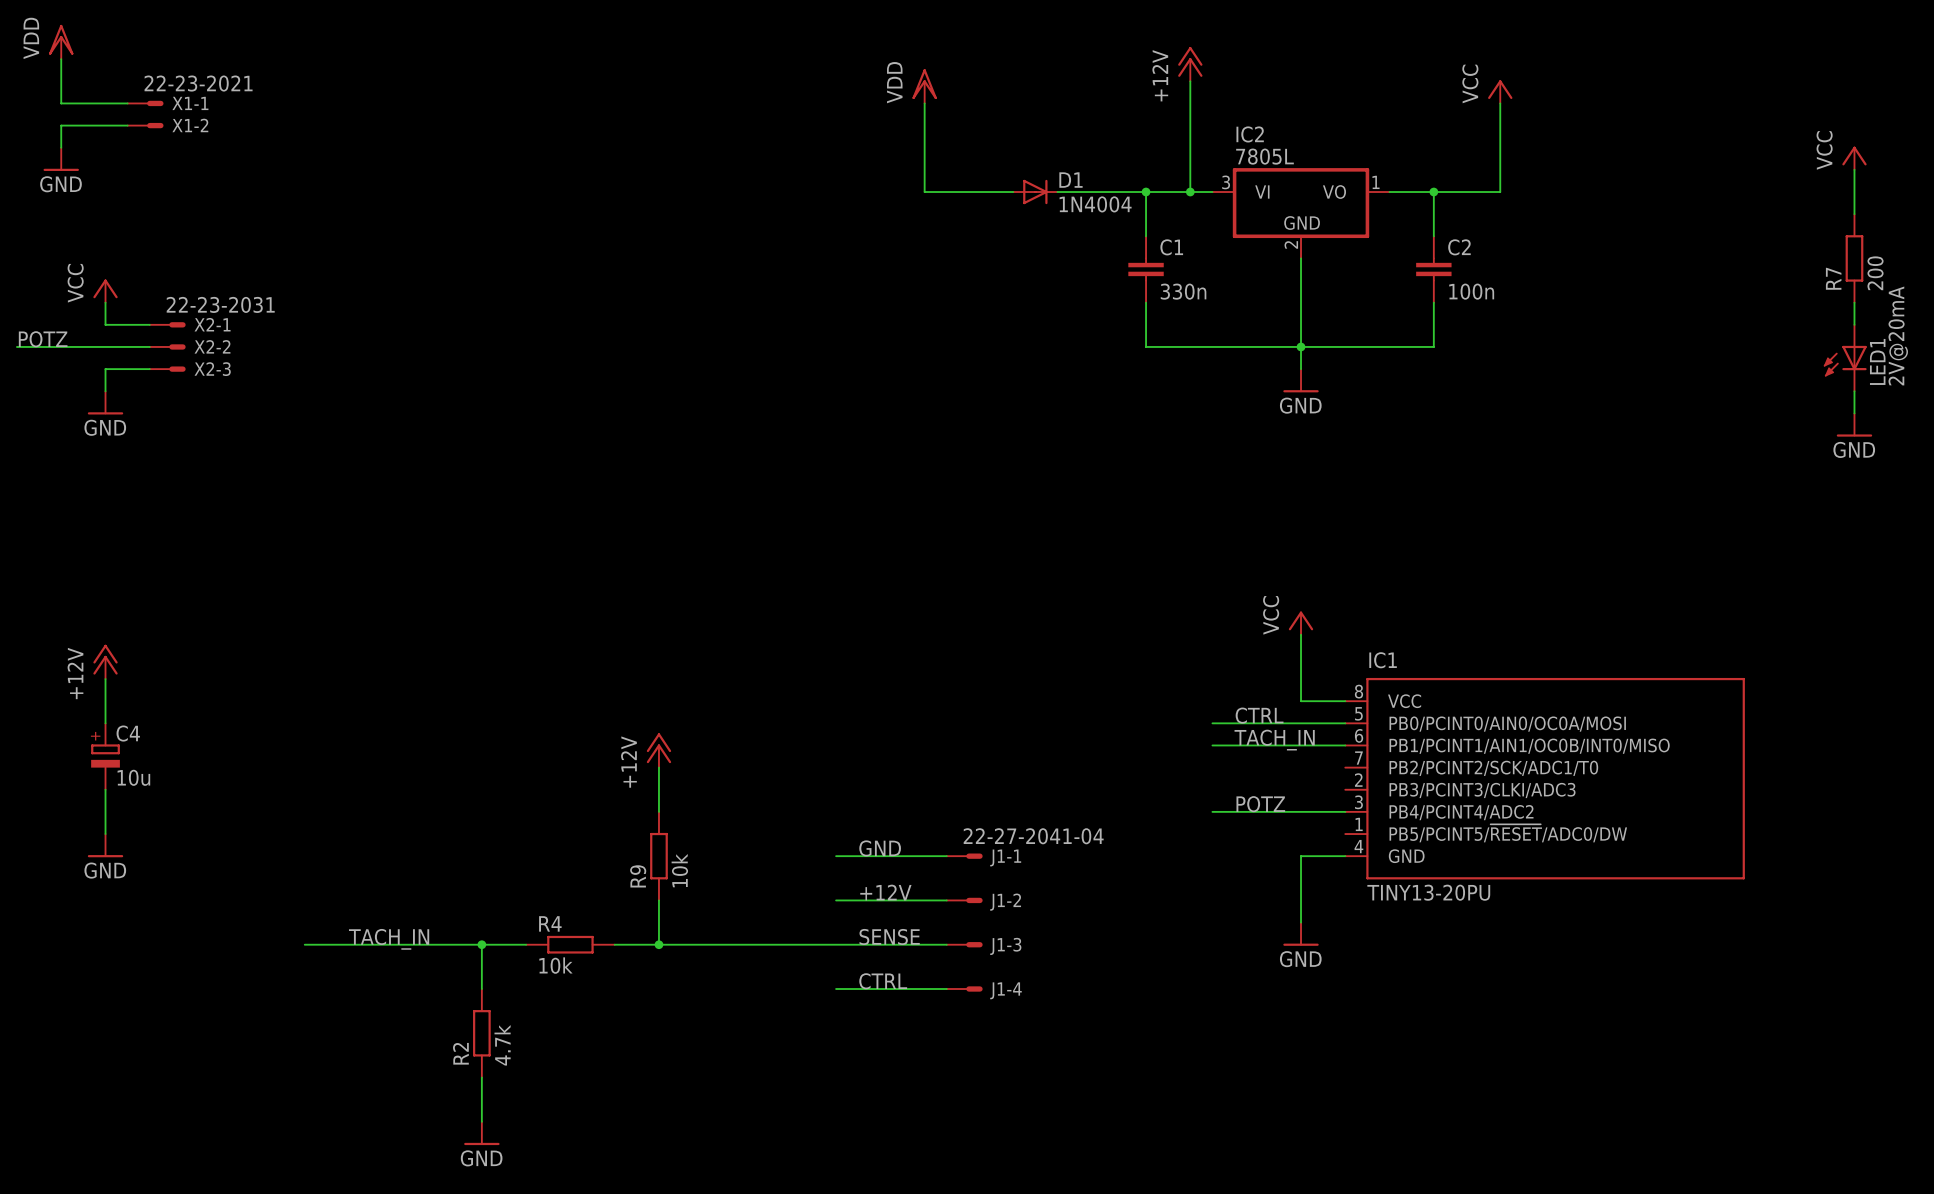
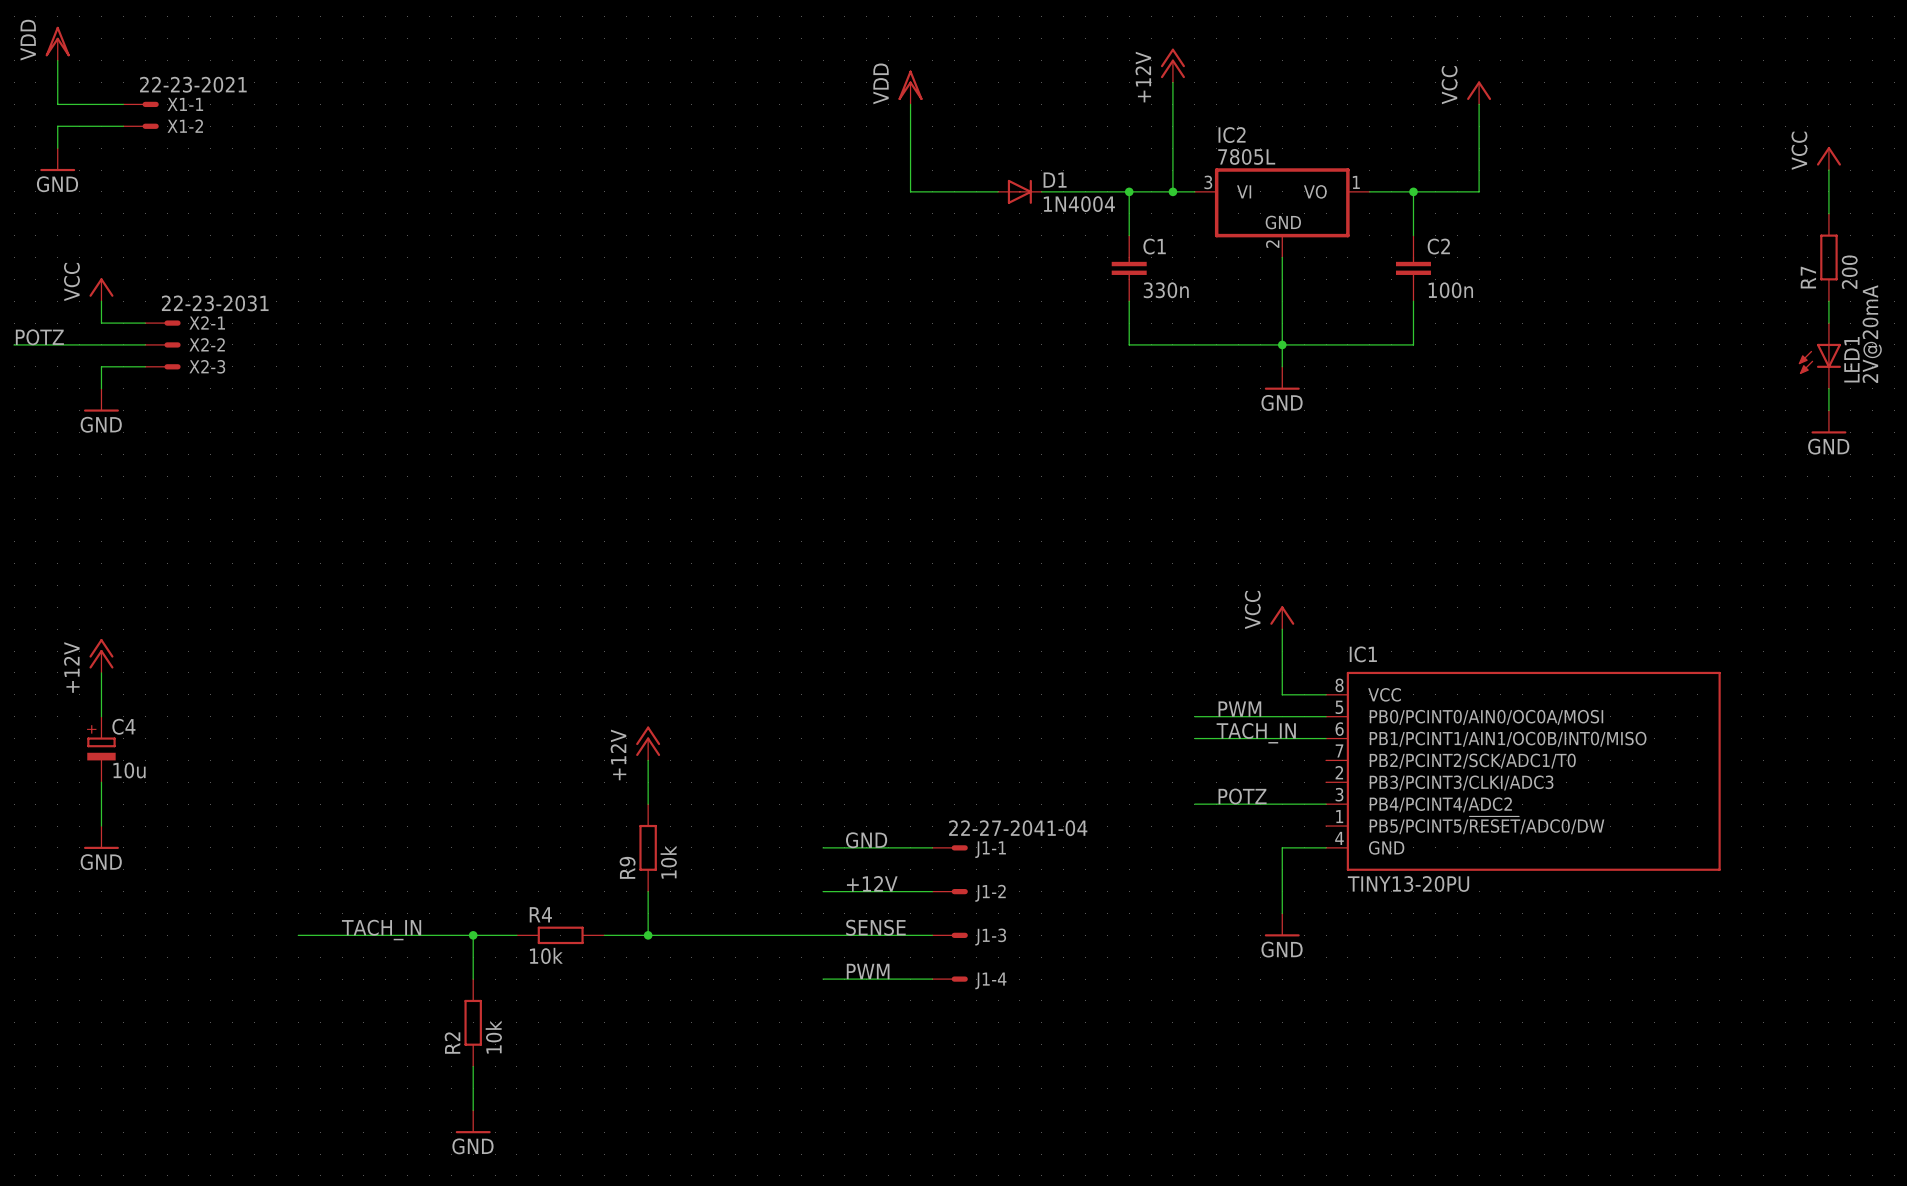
label: CTRL (1259, 715) -> PWM (1239, 709)
label: CTRL (883, 981) -> PWM (868, 971)
R2 value: 4.7k (502, 1045) -> 10k (493, 1037)

